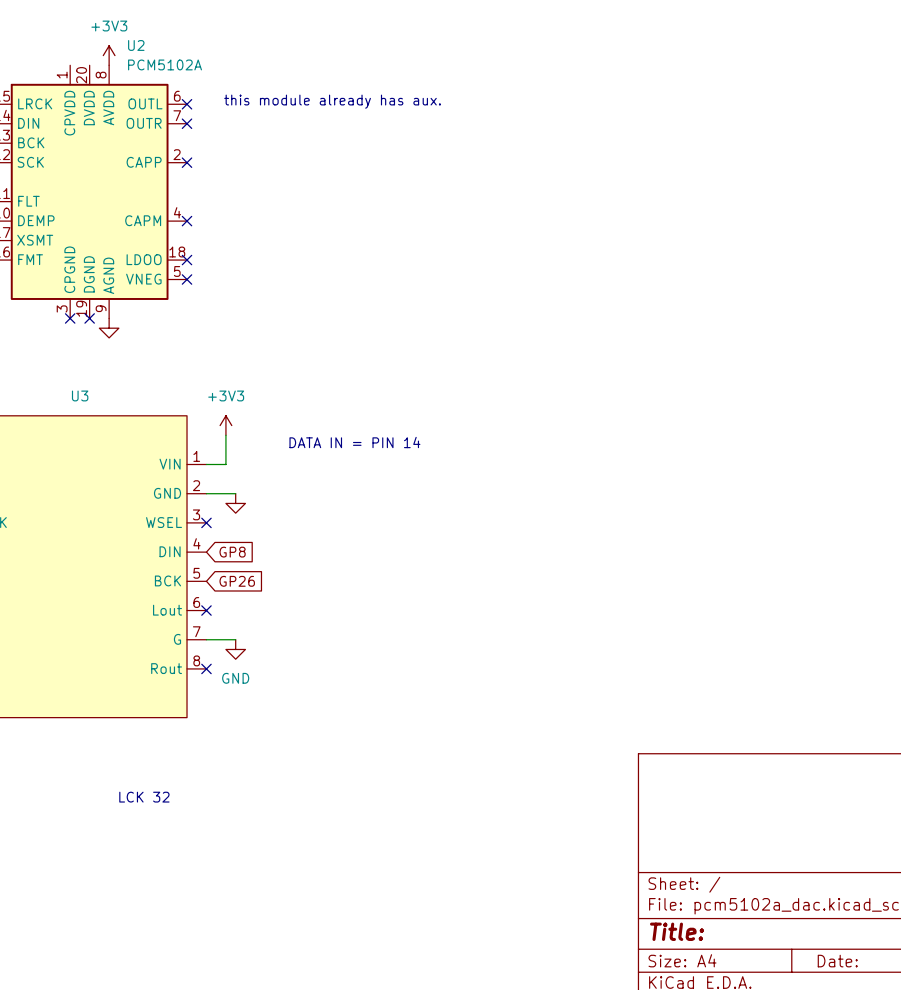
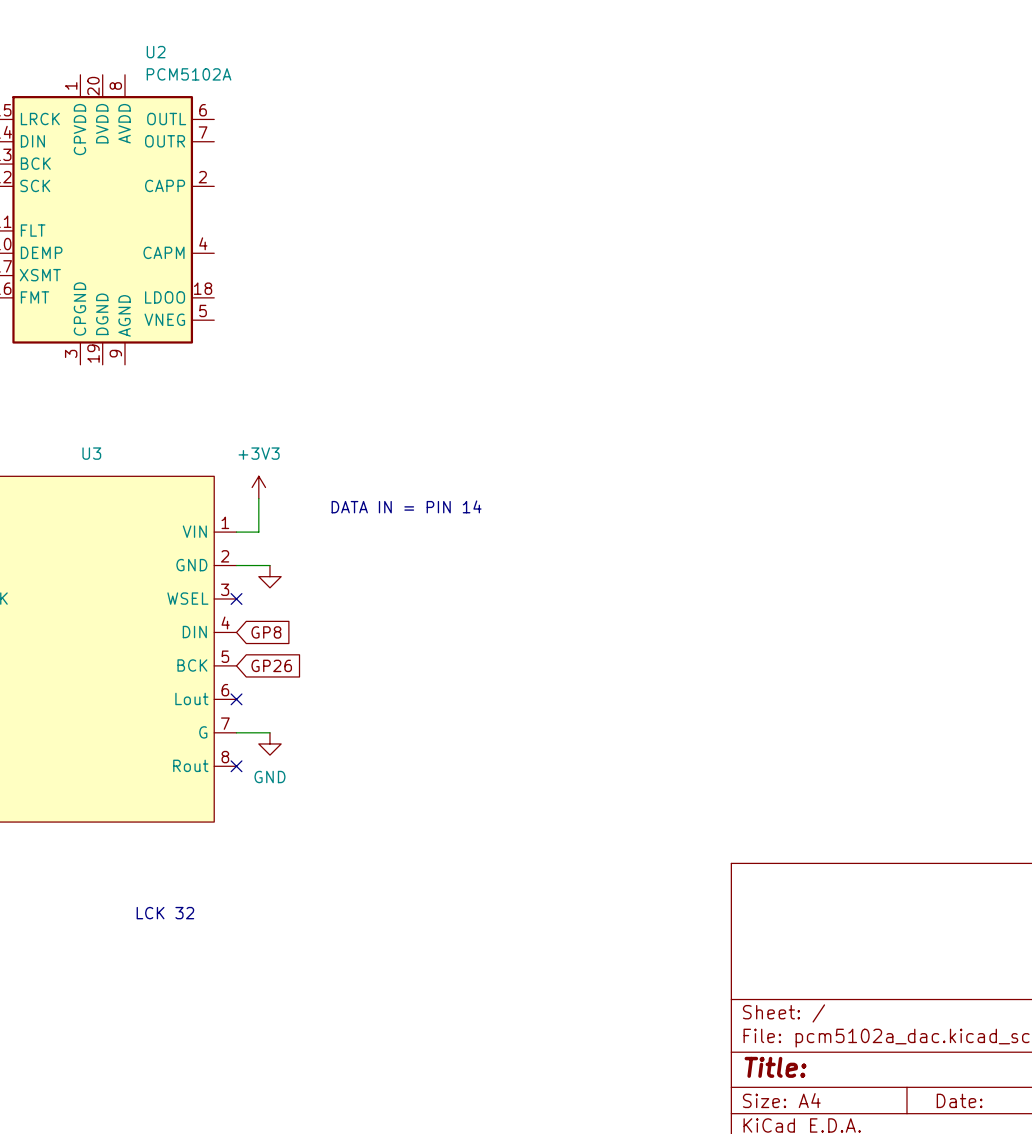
power symbol: +3V3 (109, 55) -> none
text: this module already has aux. (332, 101) -> none
no-connect mark: (187, 104) -> none
no-connect mark: (187, 123) -> none
no-connect mark: (187, 162) -> none
no-connect mark: (187, 221) -> none
no-connect mark: (187, 260) -> none
no-connect mark: (187, 279) -> none
no-connect mark: (70, 318) -> none
no-connect mark: (89, 318) -> none
power symbol: (109, 328) -> none

